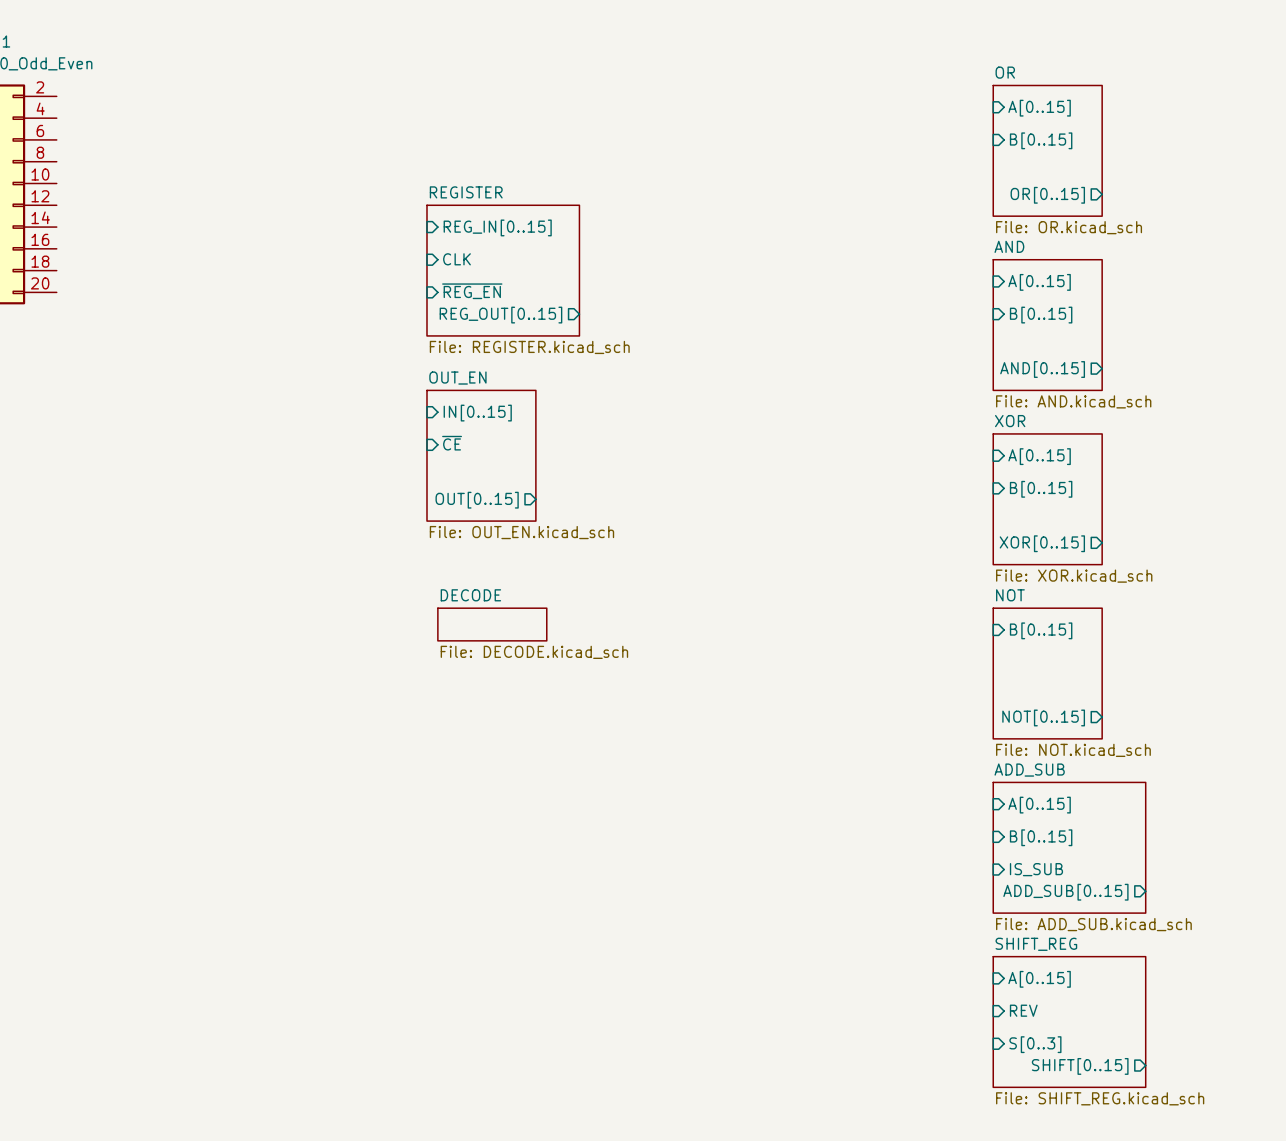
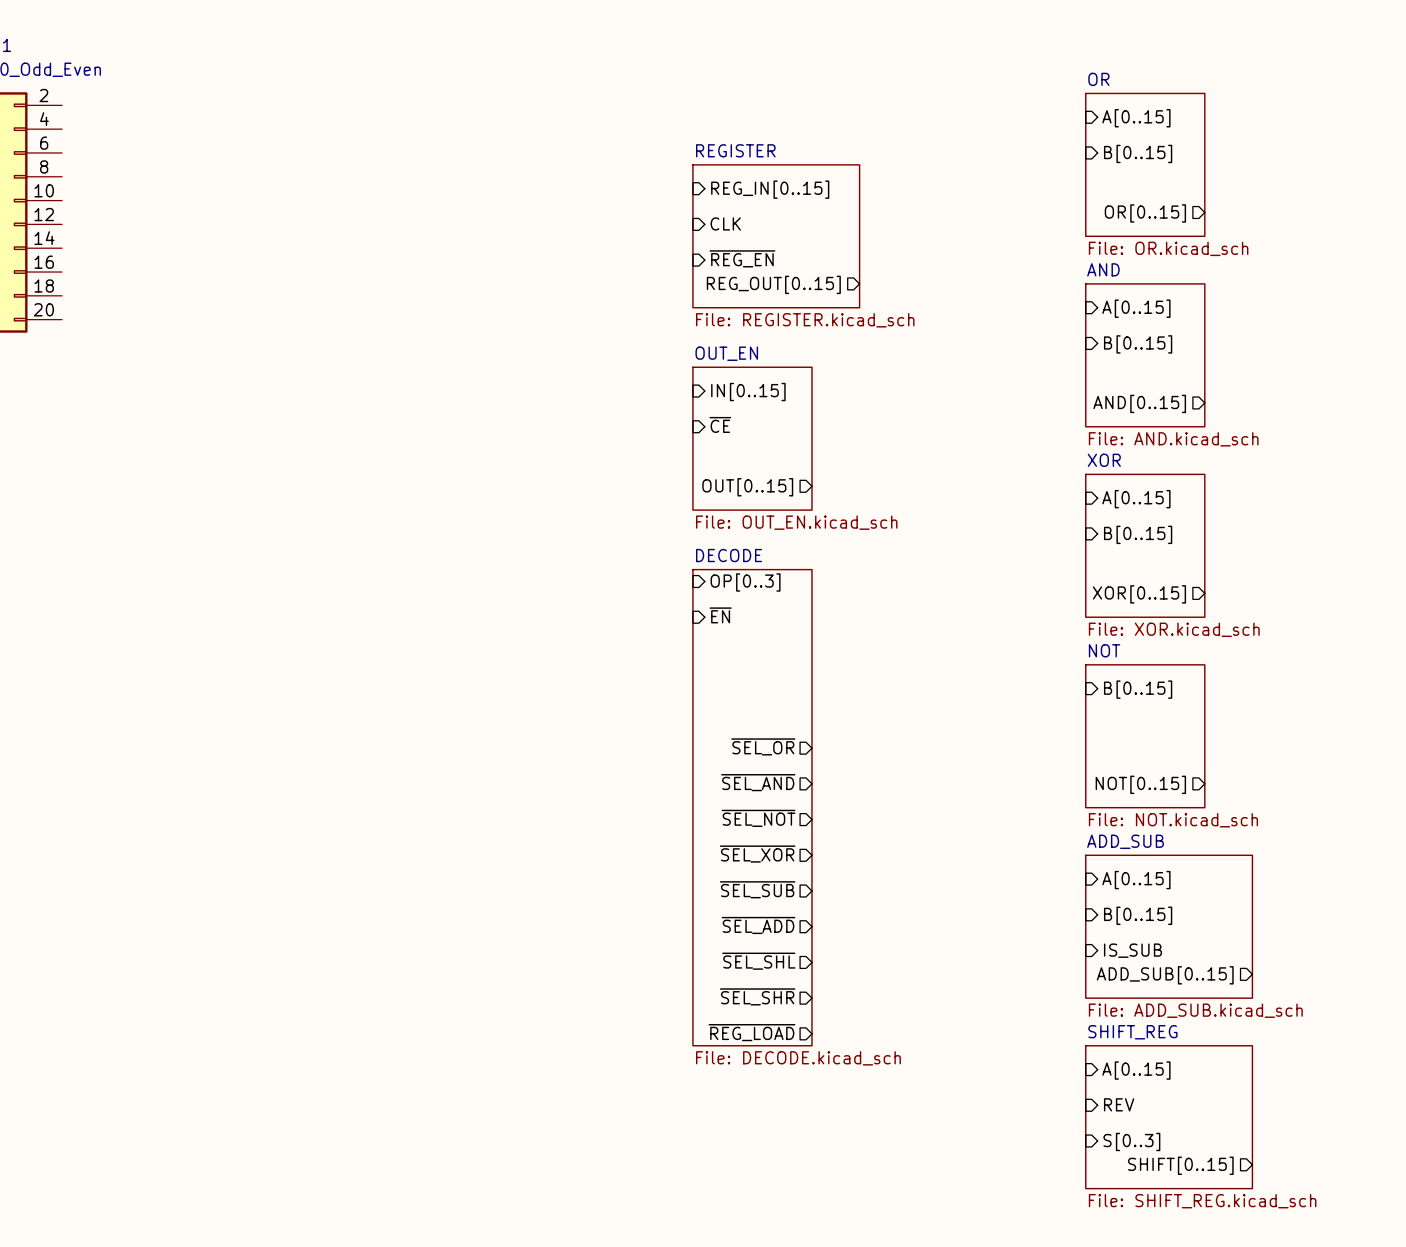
sheet pin position: REG_IN[0..15] (497, 227) -> REG_IN[0..15] (770, 189)
sheet pin position: CLK (456, 259) -> CLK (725, 223)
sheet REGISTER position: (503, 270) -> (776, 236)
sheet pin position: ~{REG_EN} (472, 291) -> ~{REG_EN} (742, 258)
sheet pin position: REG_OUT[0..15] (500, 315) -> REG_OUT[0..15] (773, 284)
sheet pin position: IN[0..15] (477, 413) -> IN[0..15] (748, 392)
sheet pin position: ~{CE} (452, 443) -> ~{CE} (720, 424)
sheet OUT_EN position: (481, 455) -> (752, 438)
sheet pin position: OUT[0..15] (477, 500) -> OUT[0..15] (747, 487)
sheet pin: none -> OP[0..3] (745, 582)
sheet pin: none -> ~{EN} (720, 615)
sheet DECODE: File: DECODE.kicad_sch (492, 624) -> none
sheet pin: none -> ~{SEL_OR} (763, 746)
sheet pin: none -> ~{SEL_AND} (758, 782)
sheet DECODE: none -> File: DECODE.kicad_sch (752, 807)
sheet pin: none -> ~{SEL_NOT} (758, 818)
sheet pin: none -> ~{SEL_XOR} (757, 854)
sheet pin: none -> ~{SEL_SUB} (757, 889)
sheet pin: none -> ~{SEL_ADD} (758, 925)
sheet pin: none -> ~{SEL_SHL} (758, 961)
sheet pin: none -> ~{SEL_SHR} (757, 996)
sheet pin: none -> ~{REG_LOAD} (751, 1032)

